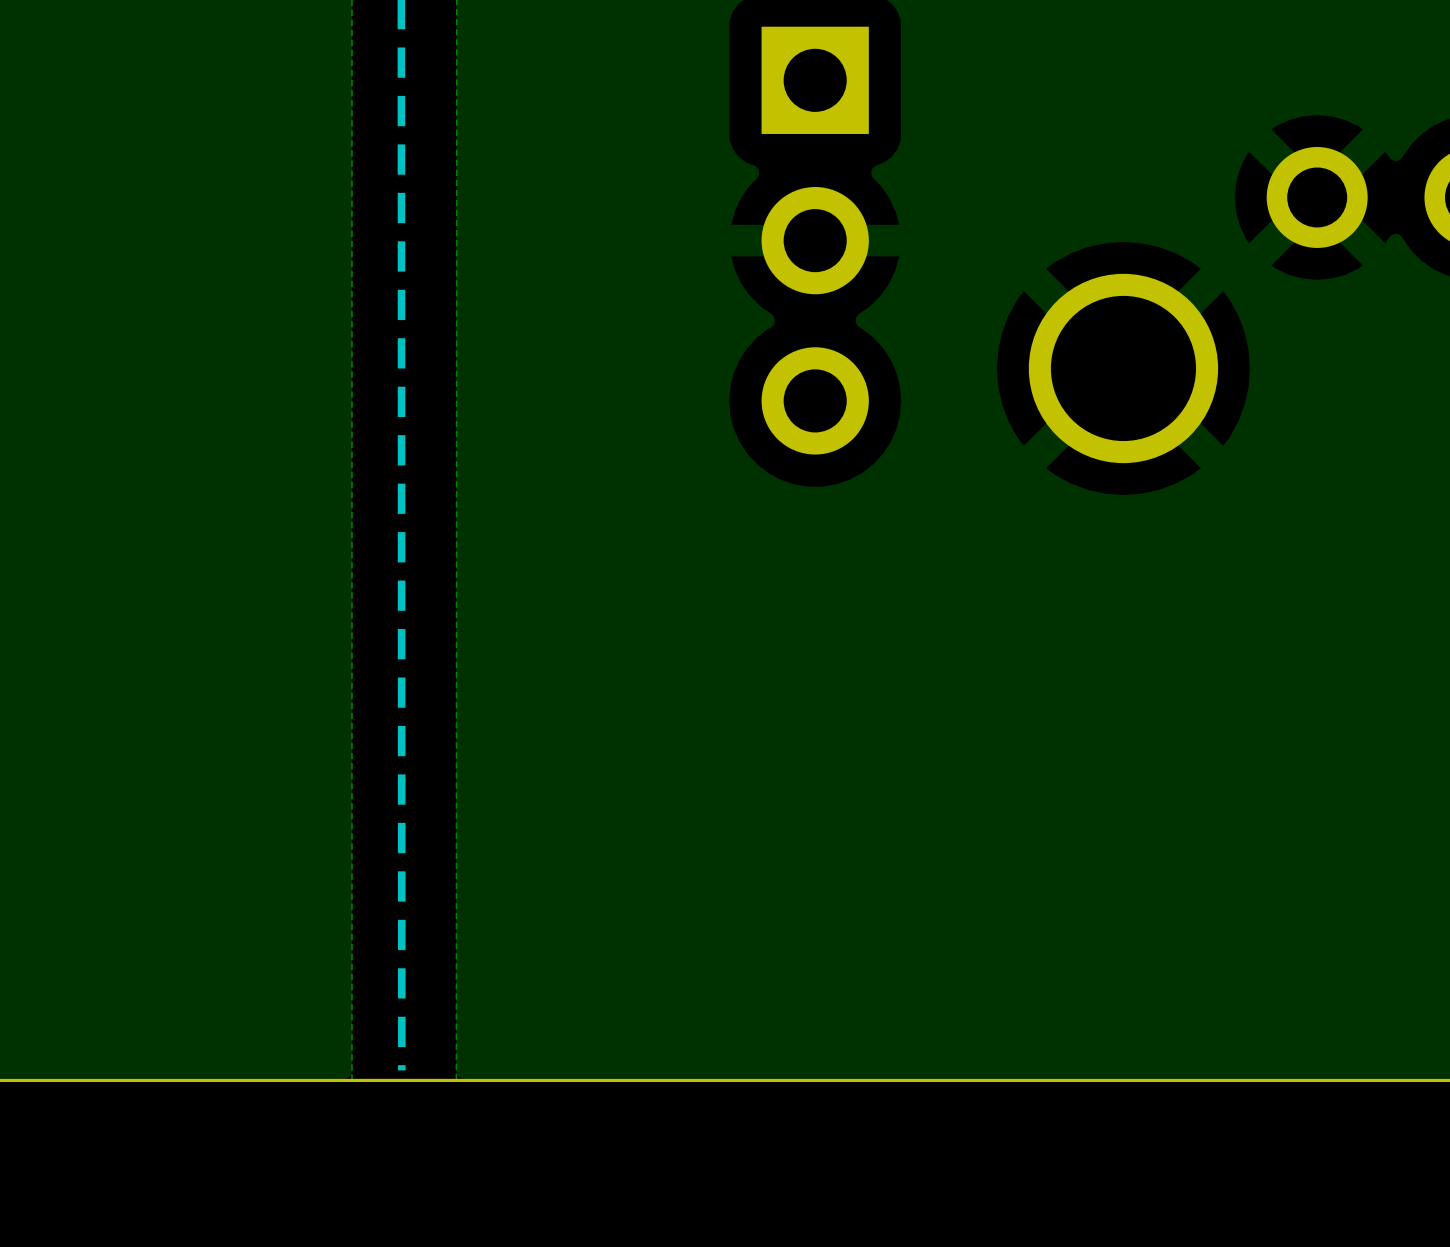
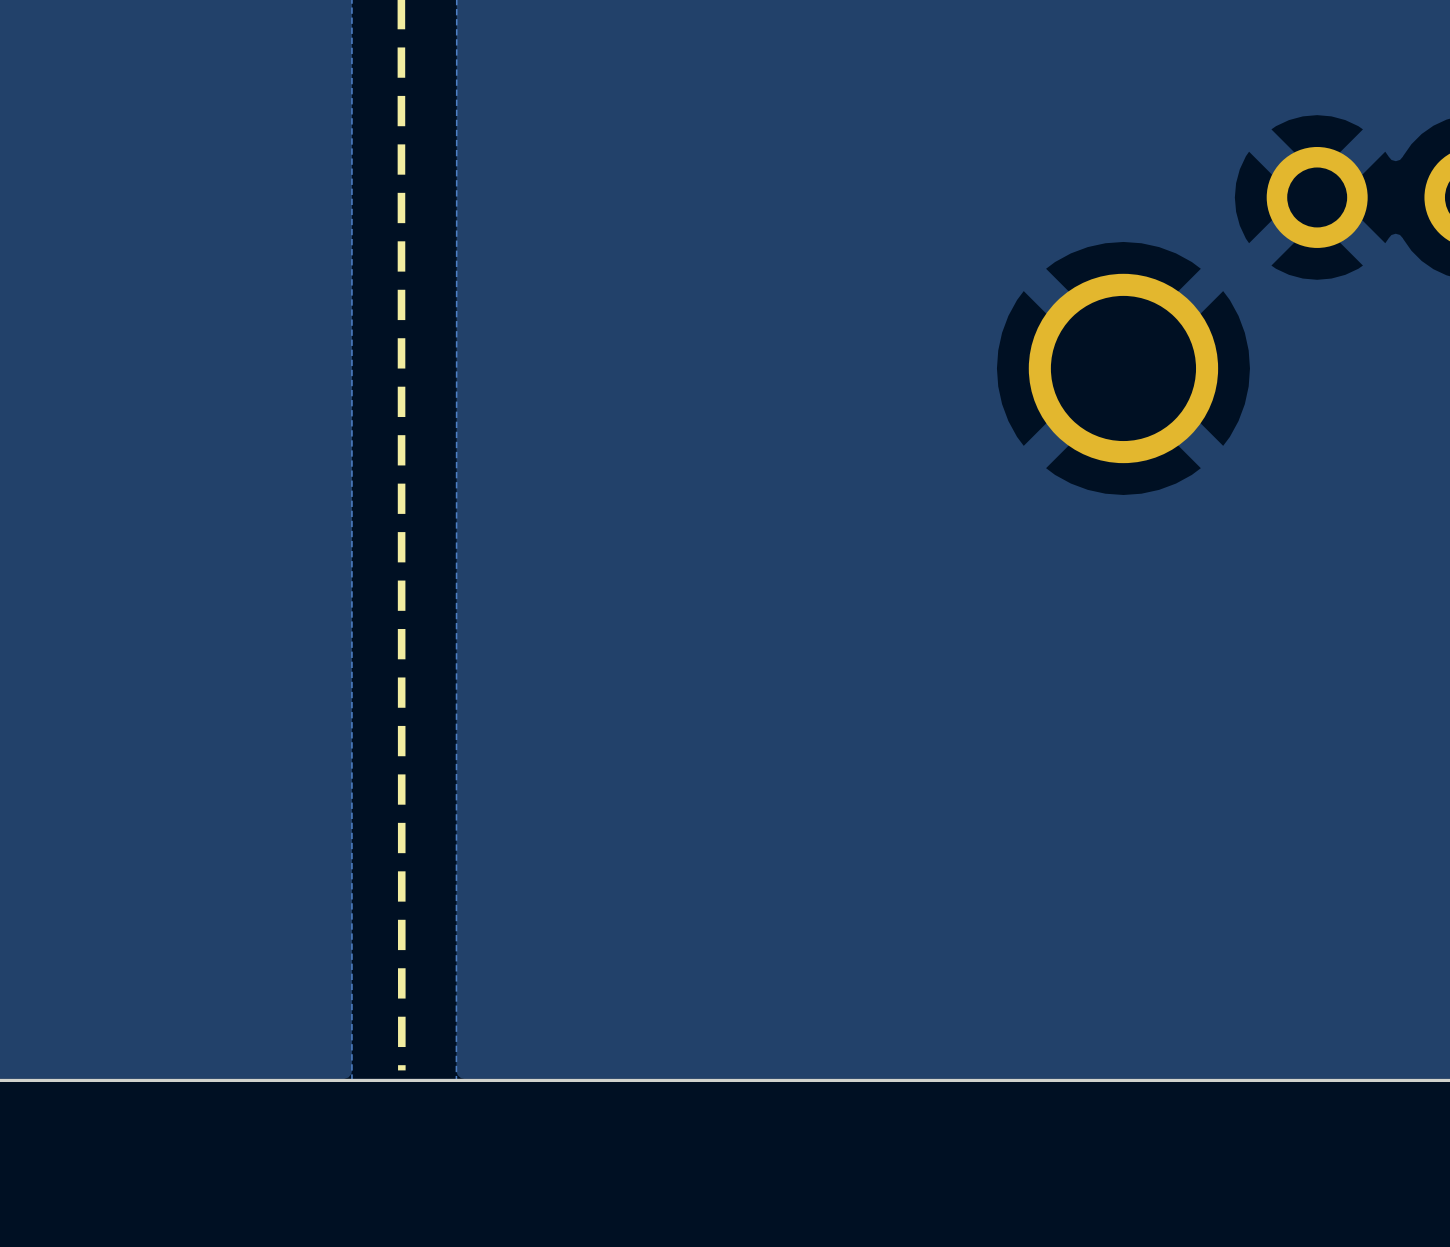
part: (815, 240) -> none

